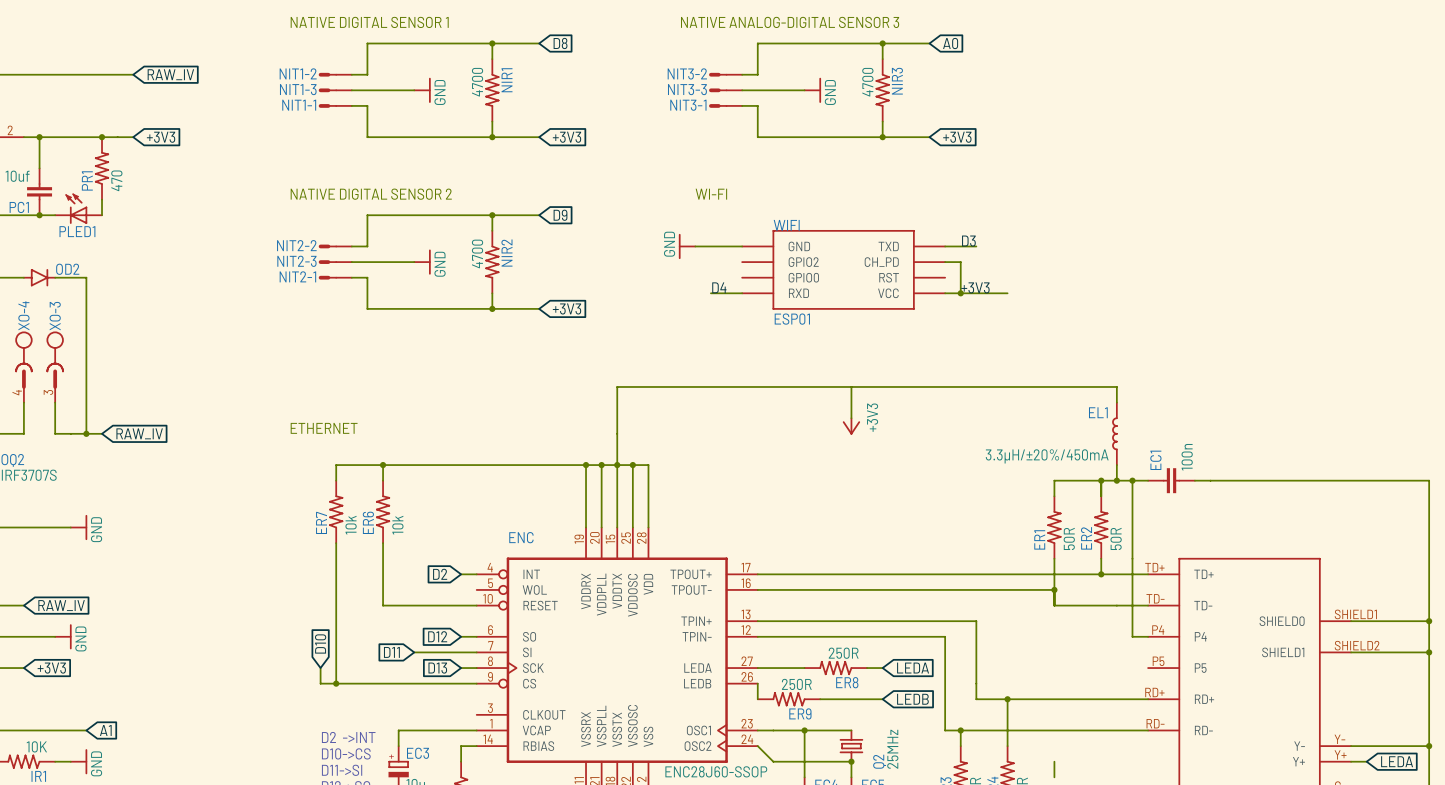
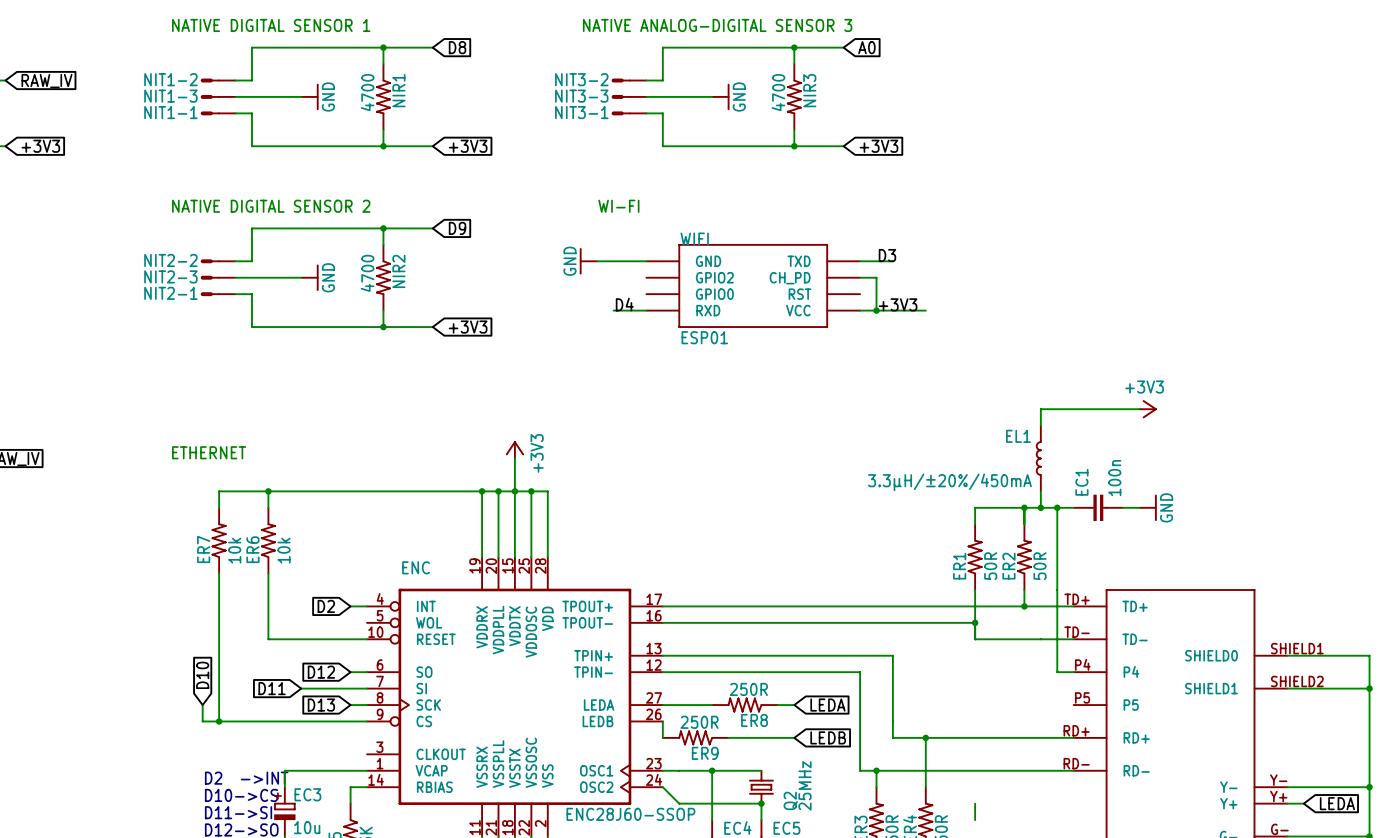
wire: (851, 386) (851, 418) -> none
wire: (1116, 386) (617, 386) (617, 433) -> (1040, 409) (1139, 409)
power symbol: none -> +3V3 (1148, 409)
power symbol: none -> +3V3 (514, 449)
power symbol: +3V3 (851, 426) -> none
wire: (1210, 480) (1429, 480) (1429, 621) -> none
power symbol: none -> GND (1148, 507)
junction: (1429, 621) -> none

